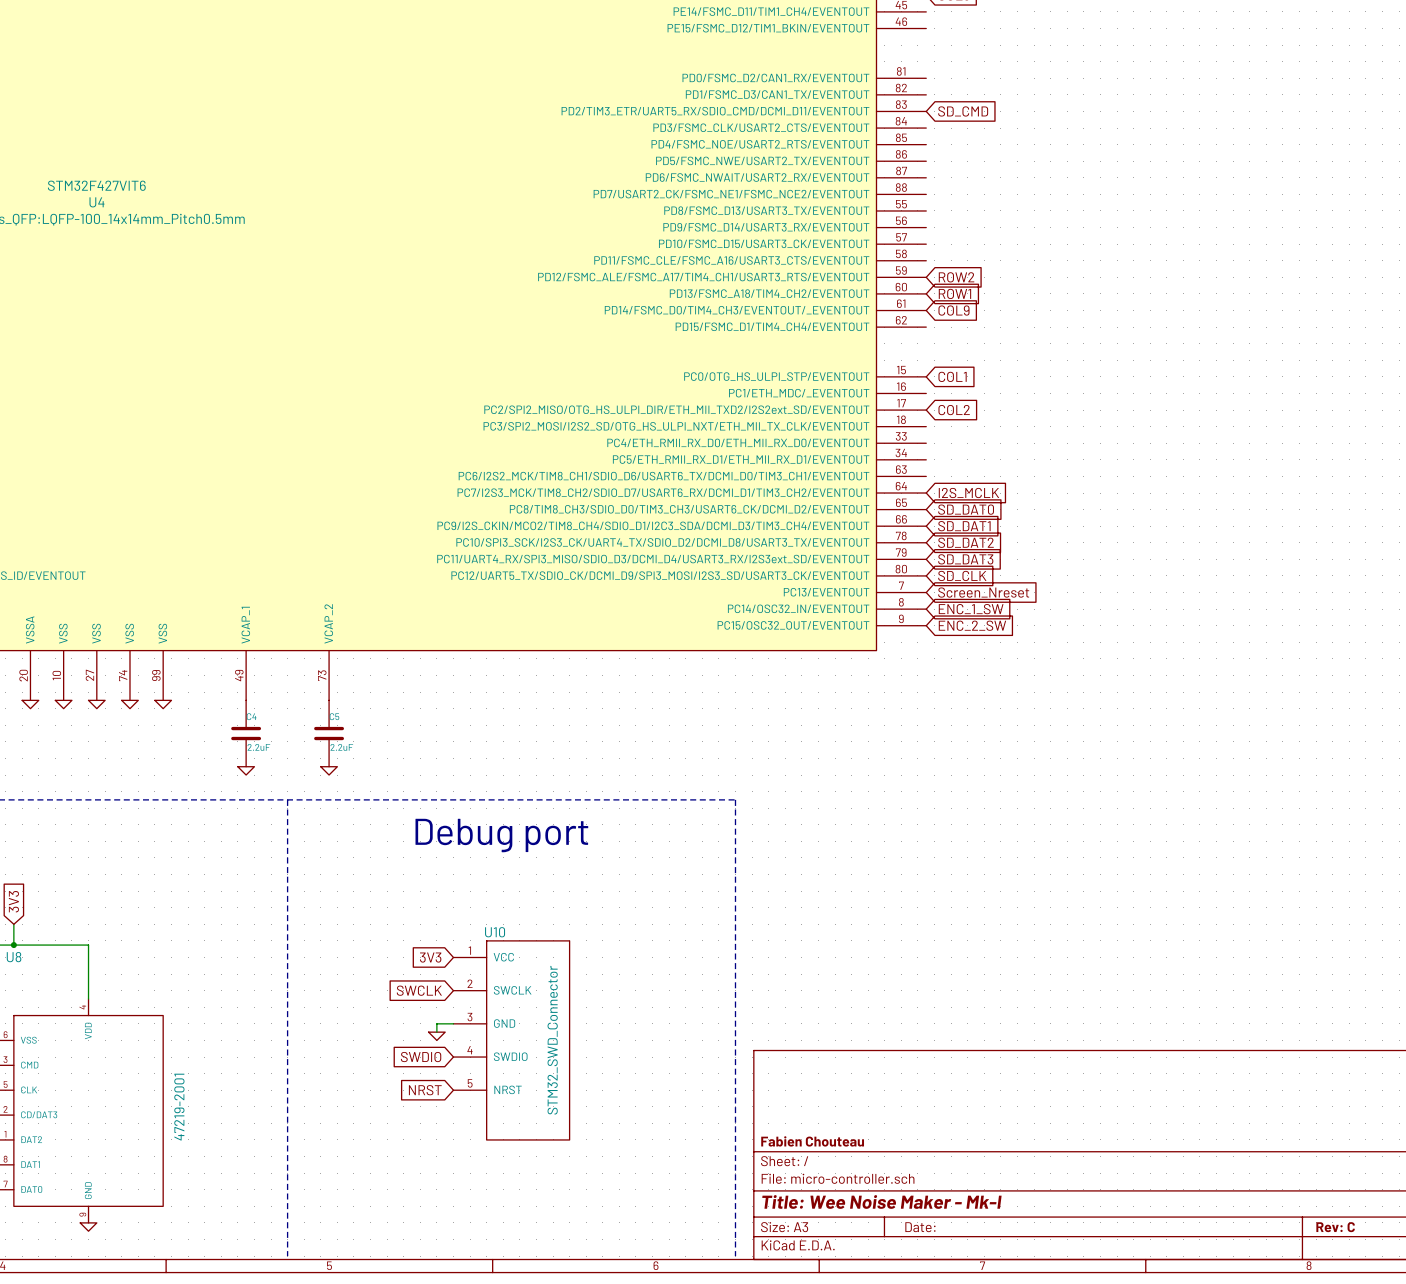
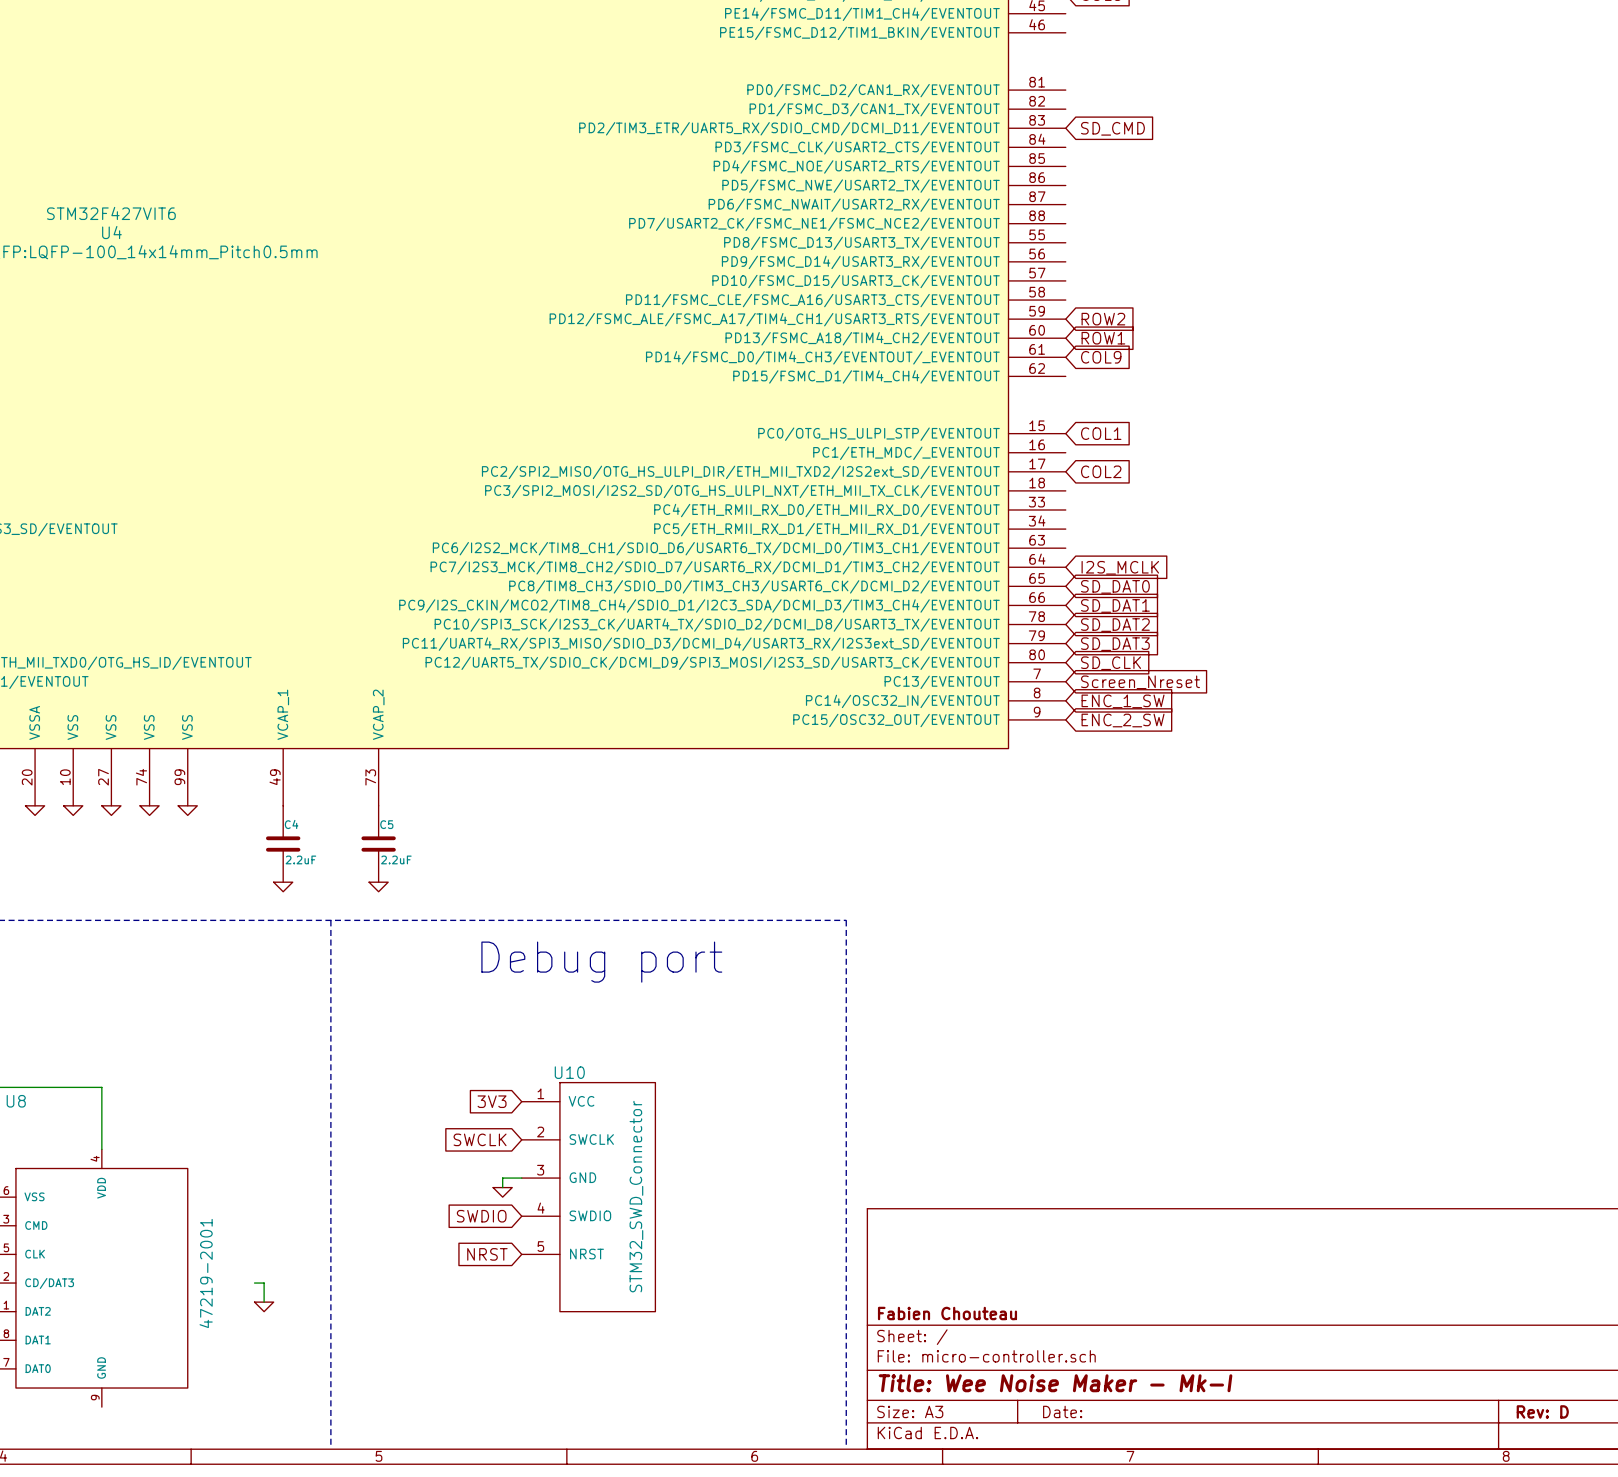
global label: 3V3 (13, 901) -> none
wire: (13, 924) (13, 945) -> none
junction: (13, 945) -> none
wire: none -> (254, 1283) (264, 1283) (264, 1302)
power symbol: none -> (264, 1306)
power symbol: (88, 1227) -> none
title block: Rev: C (1335, 1227) -> Rev: D (1542, 1411)

